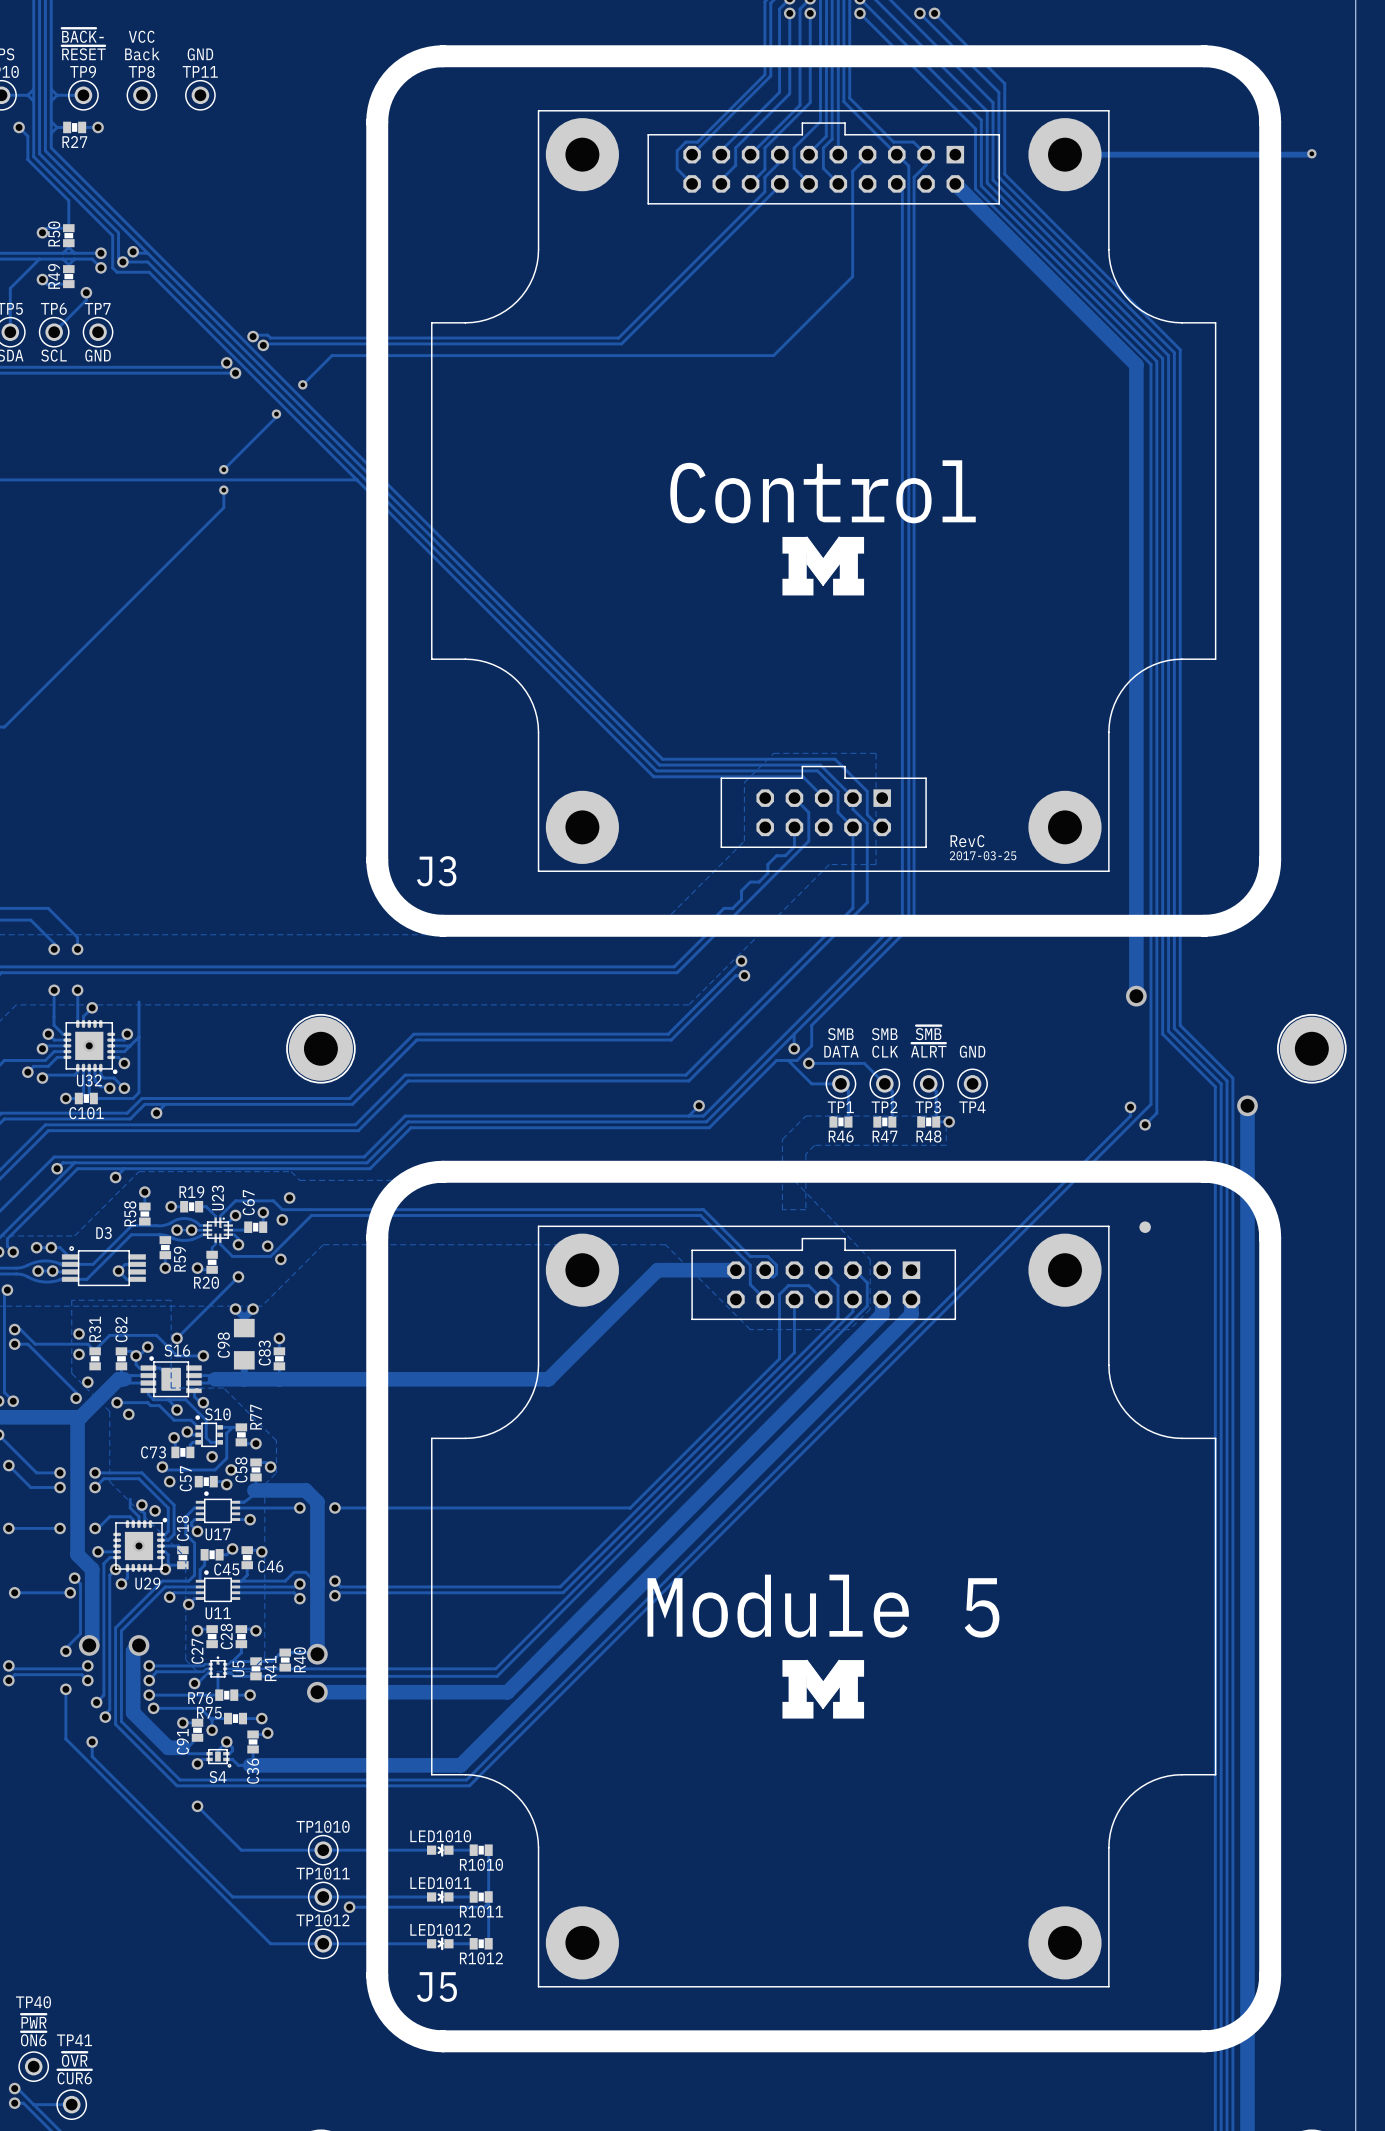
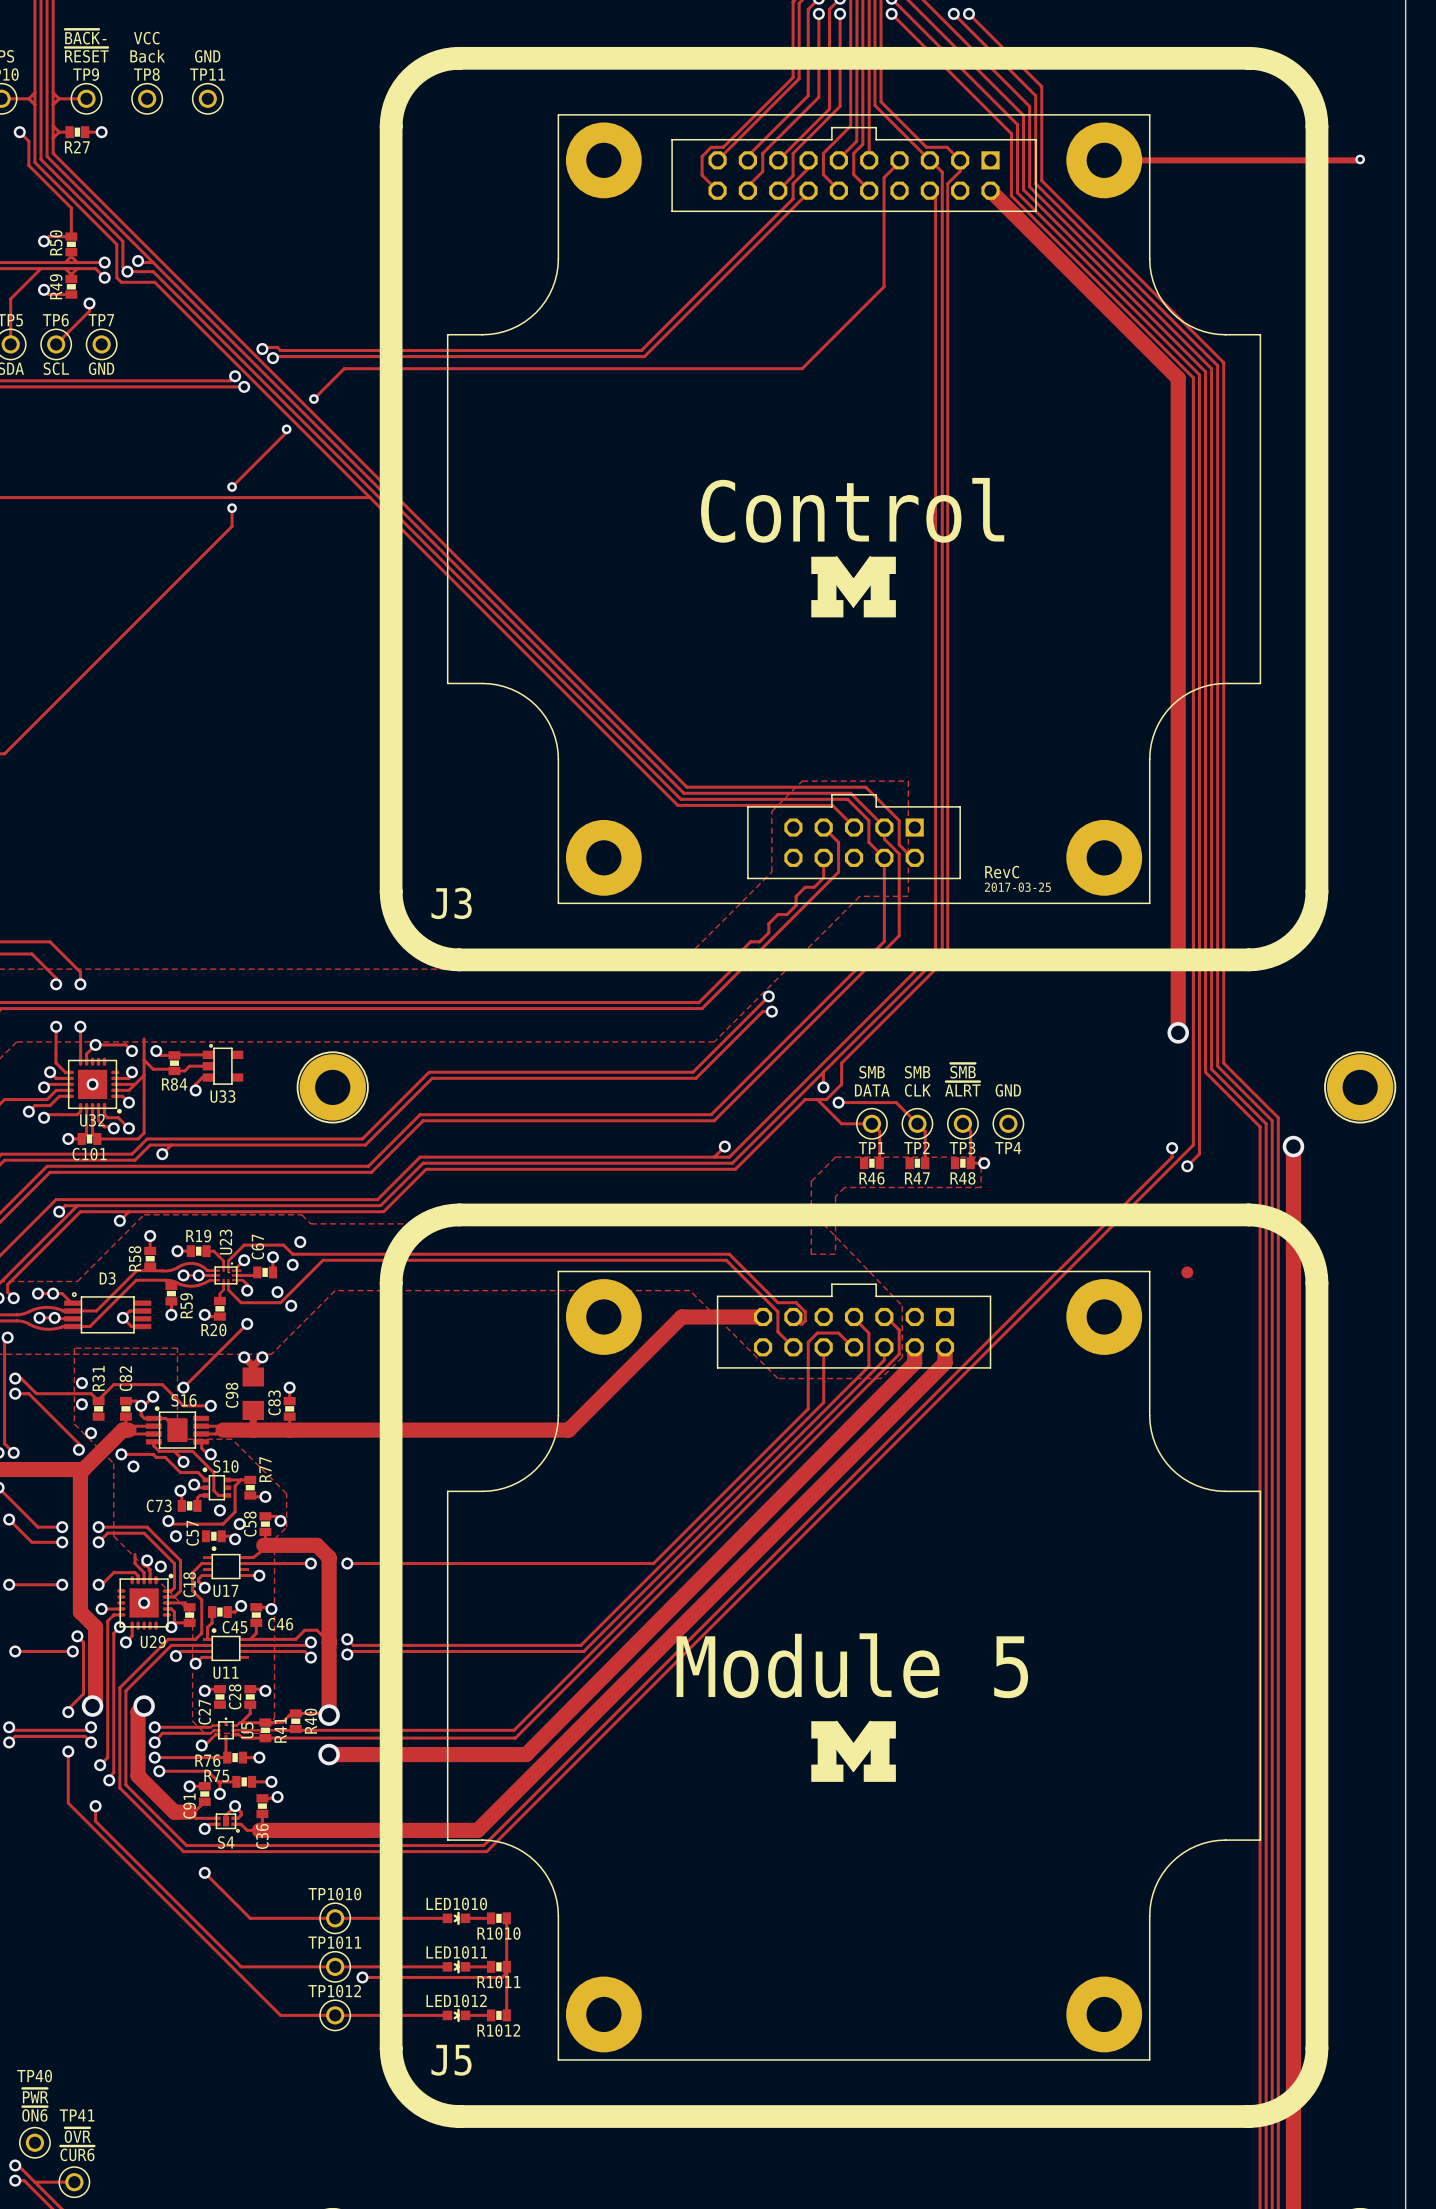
track: none -> (95, 1044) (125, 1044) (131, 1051)
via: none -> (131, 1051)
track: none -> (156, 1051) (160, 1055) (208, 1054)
via: none -> (156, 1051)
track: none -> (144, 1060) (153, 1069) (184, 1070) (189, 1066) (208, 1066)
R84: none -> (174, 1063)
U33: none -> (222, 1064)
track: none -> (208, 1077) (202, 1077) (195, 1084) (195, 1090)
via: none -> (195, 1090)

